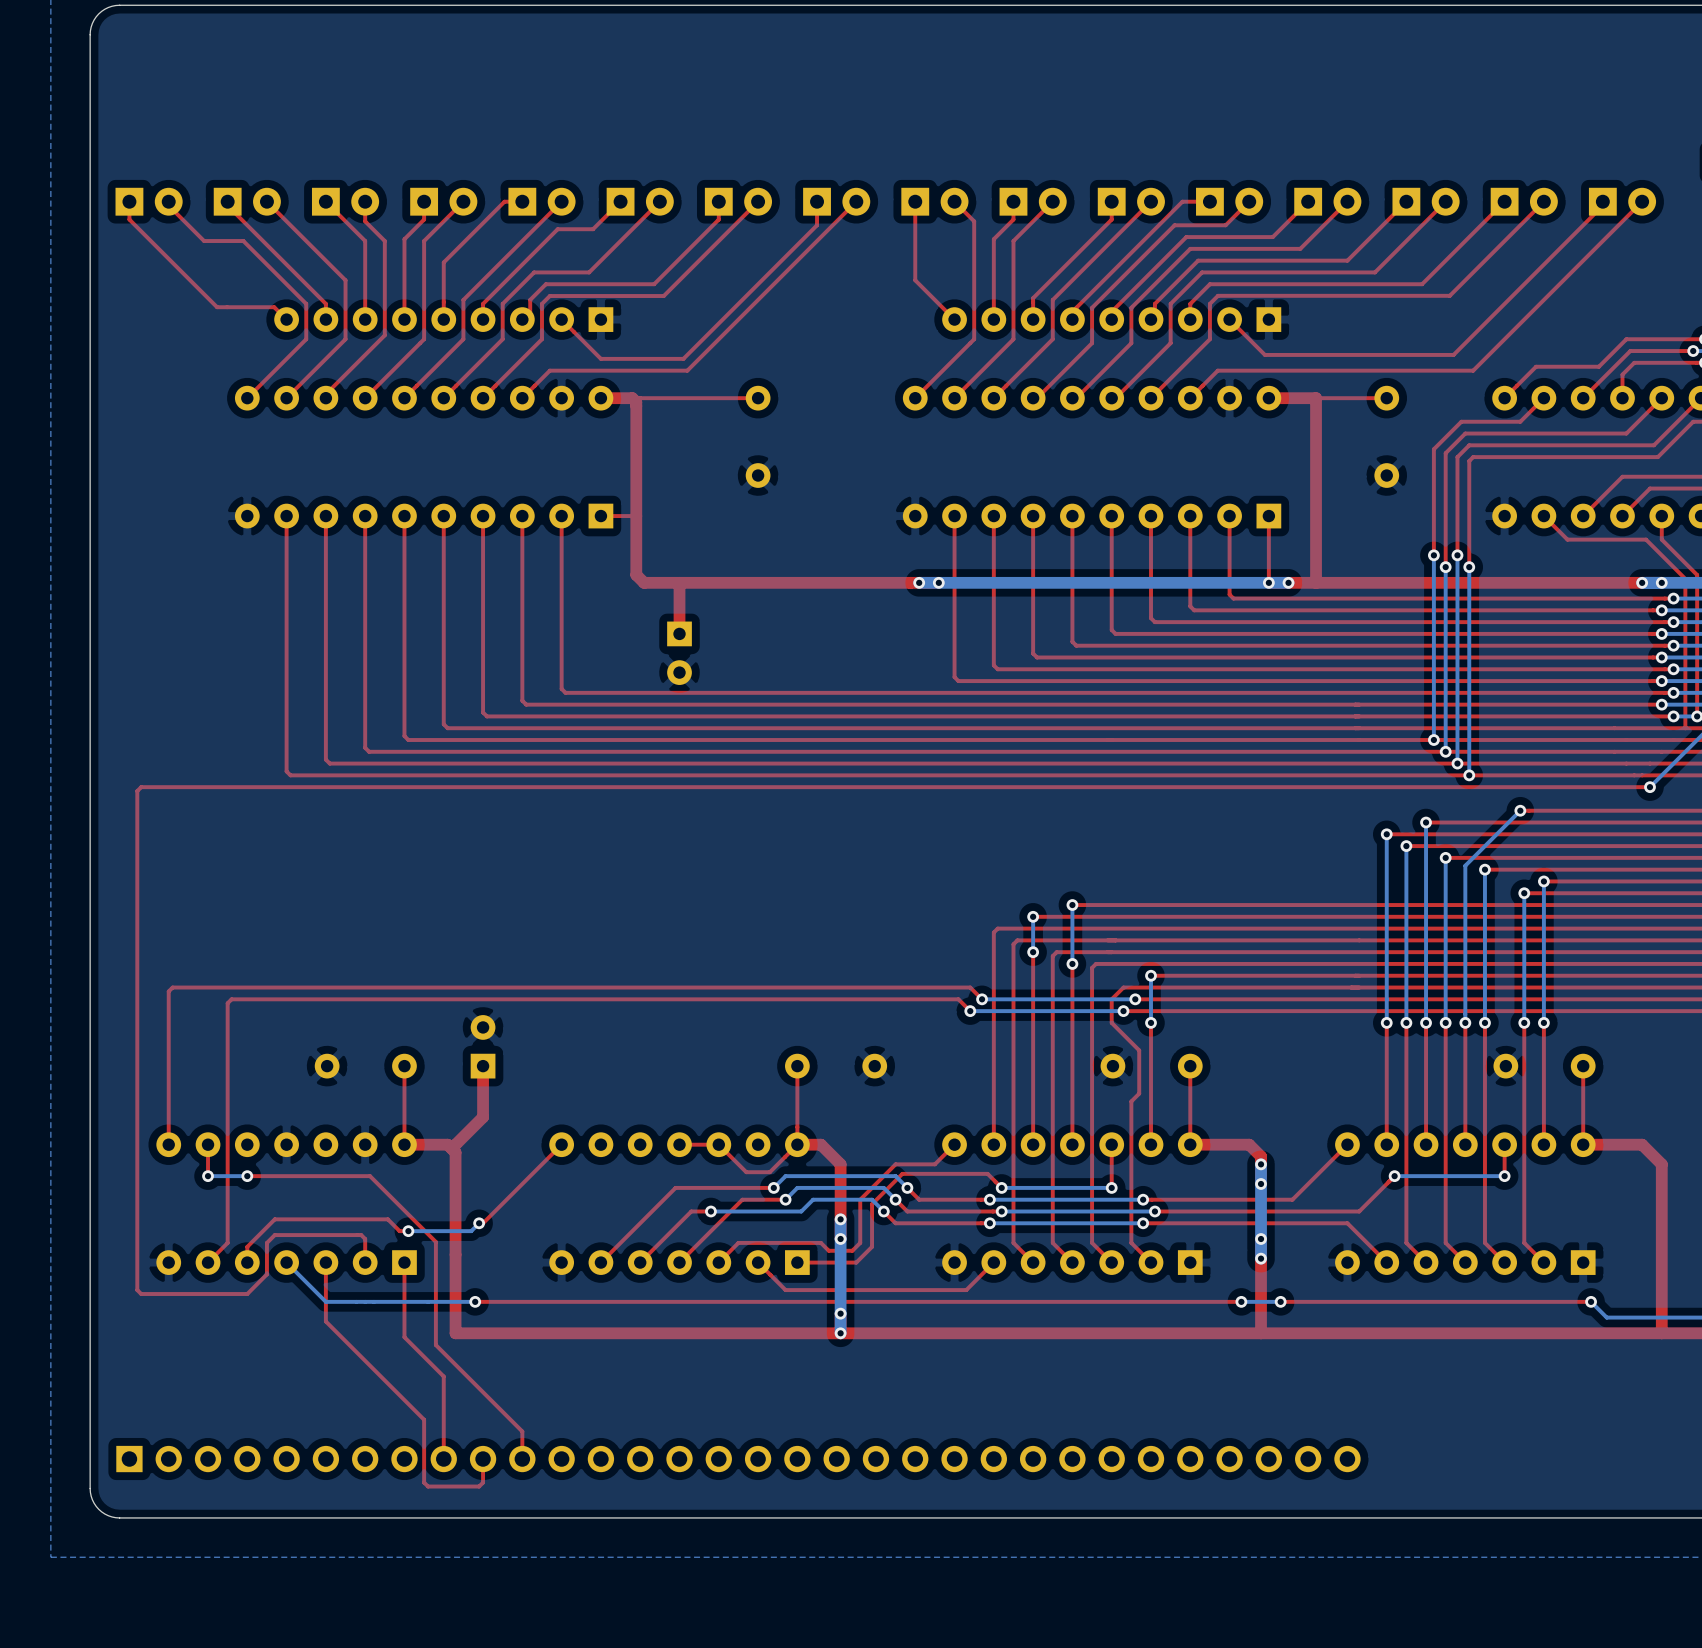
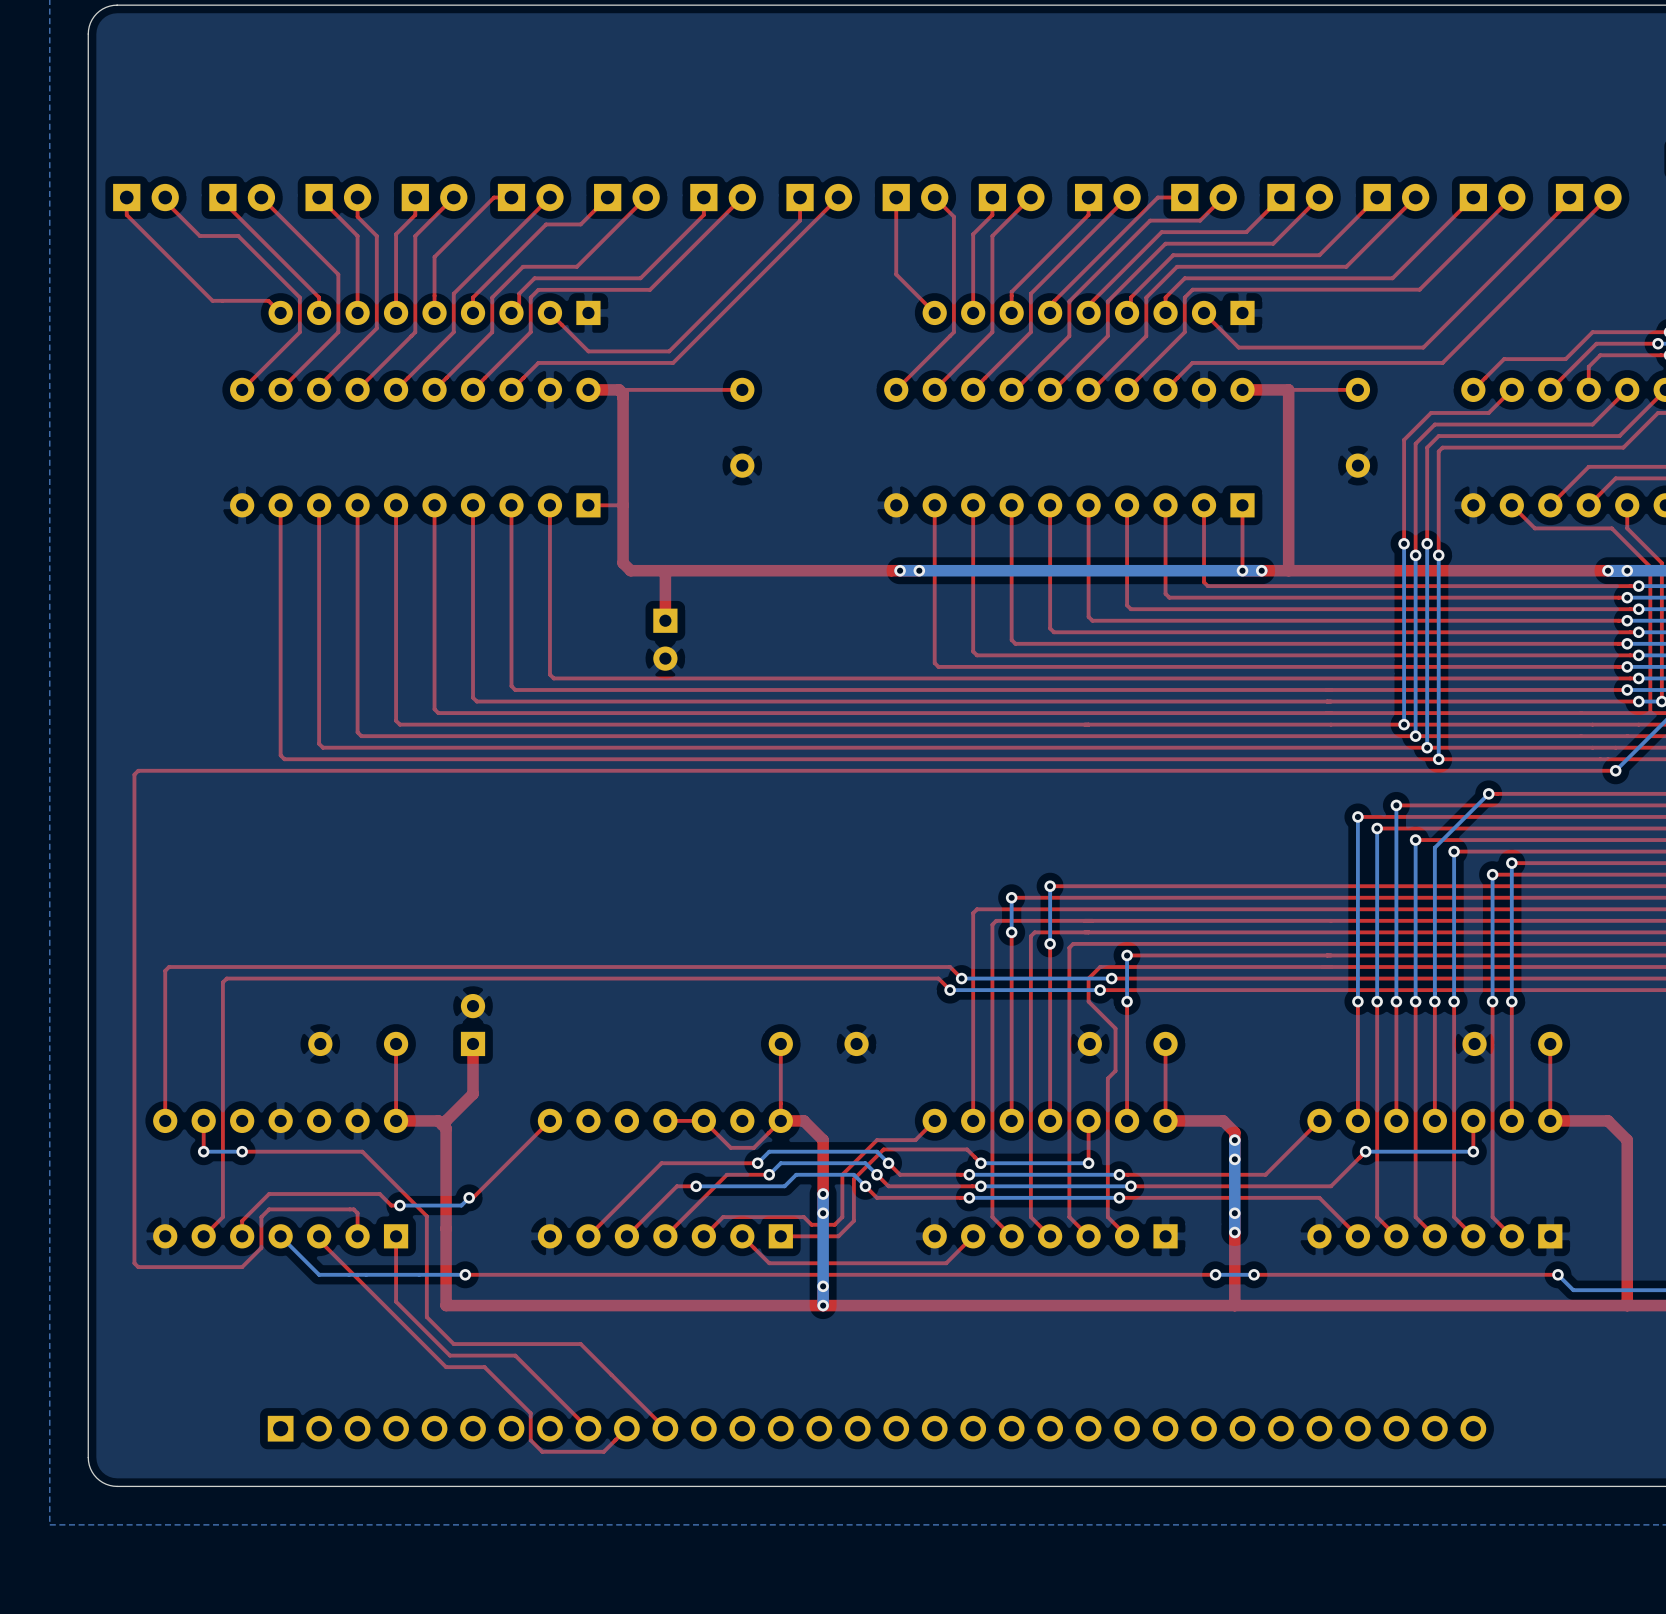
top track: (325, 1266) (325, 1321) (424, 1419) (424, 1482) (428, 1486) (479, 1486) (483, 1482) (483, 1459) -> (319, 1240) (446, 1367) (484, 1367) (530, 1413) (530, 1440) (542, 1451) (603, 1451) (626, 1428)
top track: (404, 1329) (404, 1337) (443, 1376) (443, 1459) -> (396, 1301) (449, 1355) (515, 1355) (588, 1428)
top track: (463, 1372) (522, 1431) (522, 1459) -> (453, 1344) (580, 1344) (665, 1428)
part position: (738, 1459) -> (876, 1428)

